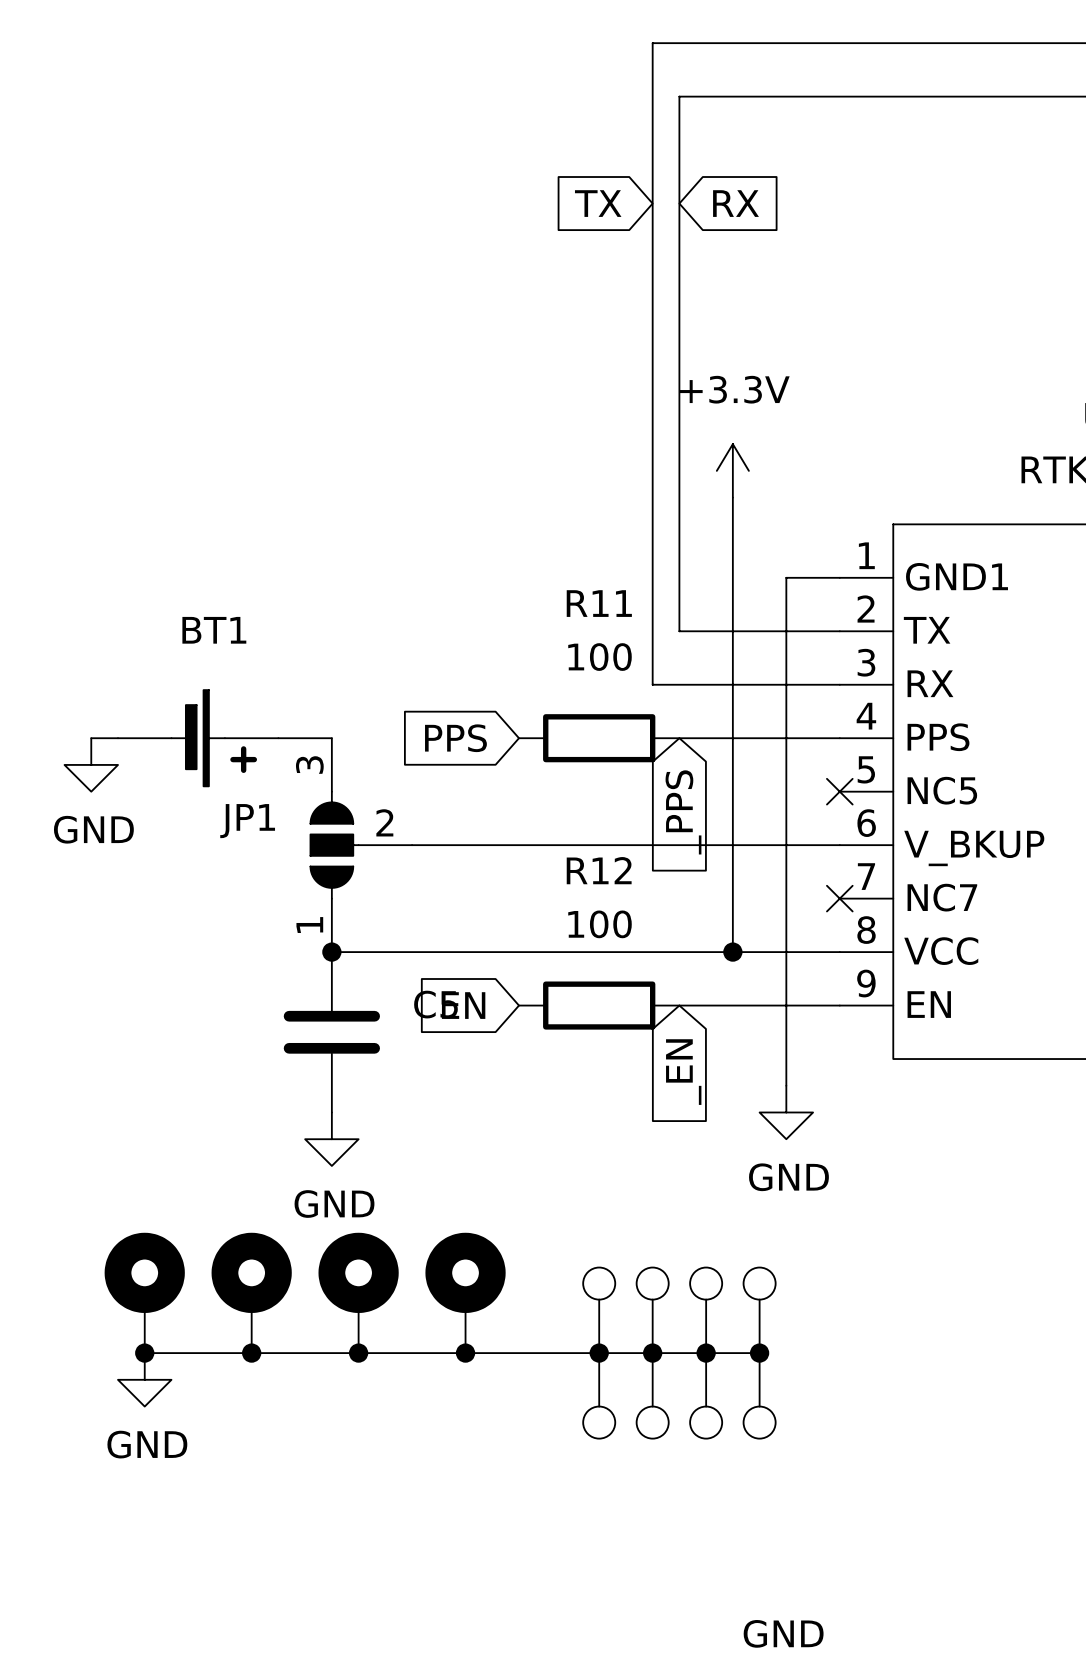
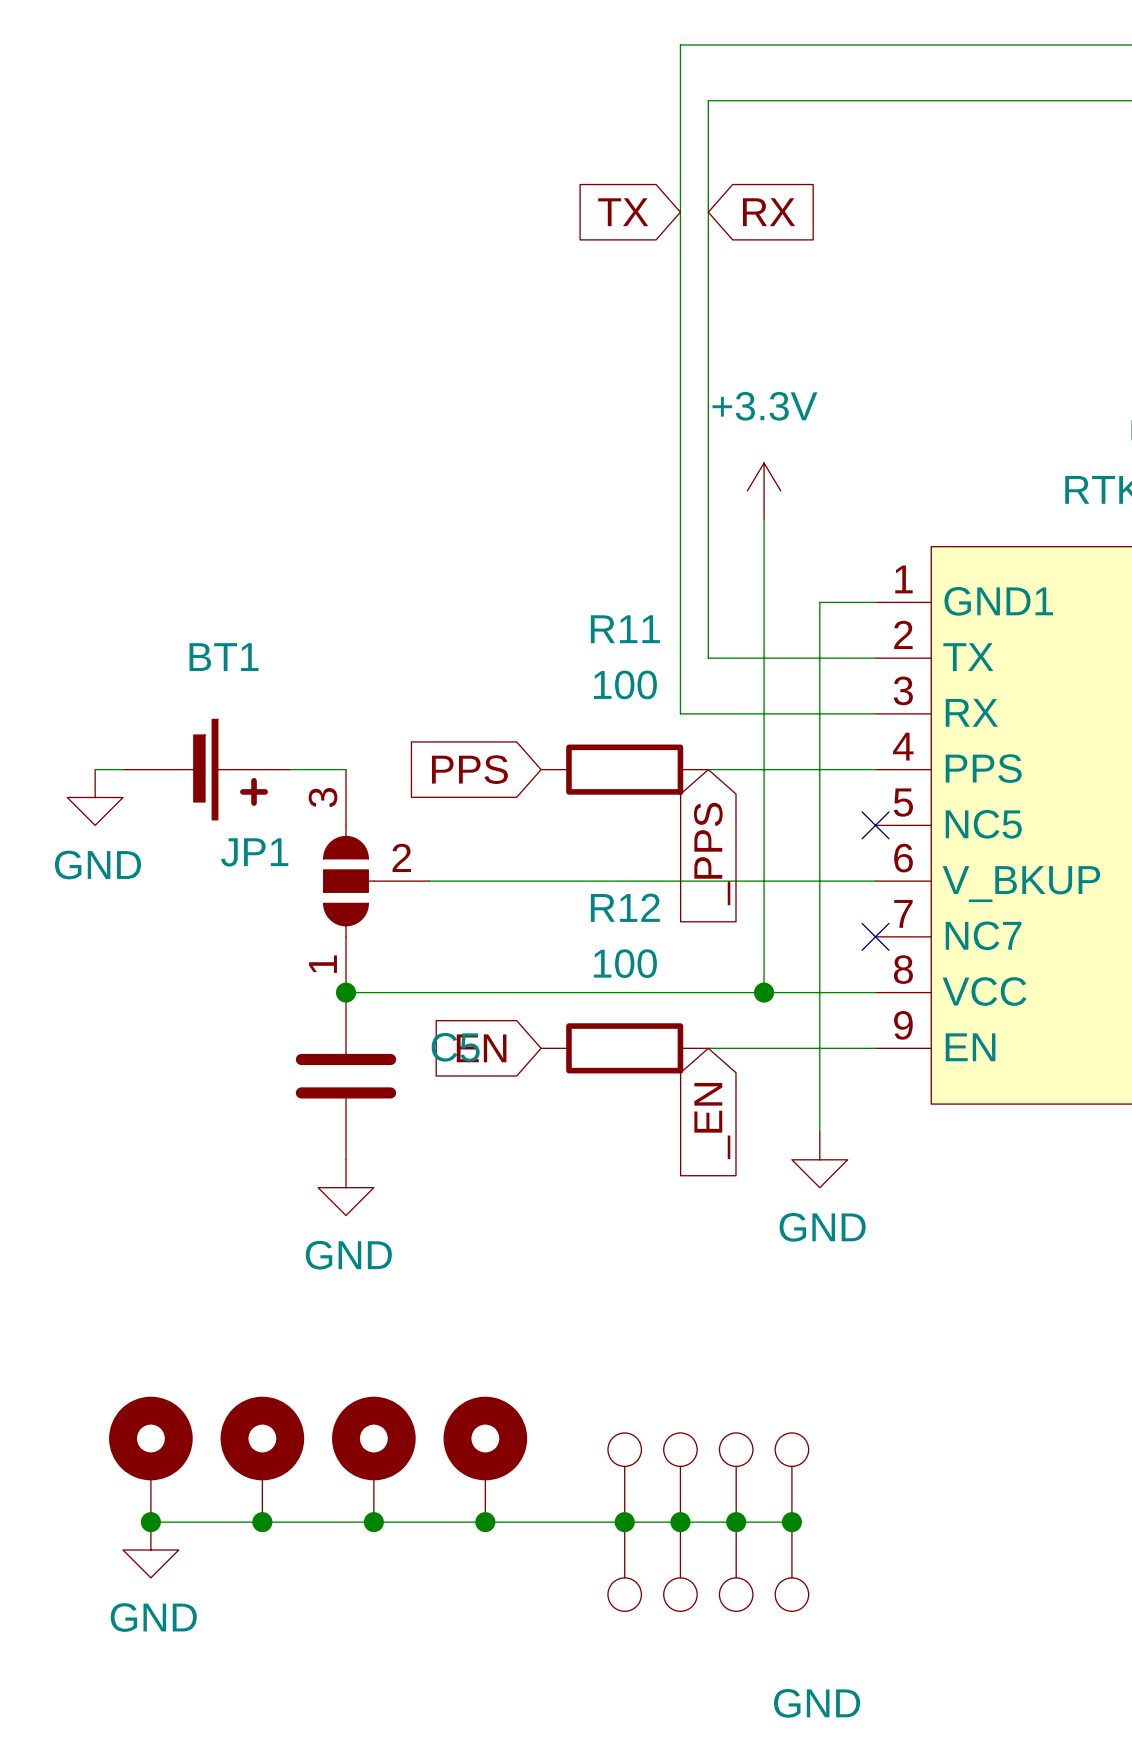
part: (144, 1292) -> none
part: (251, 1292) -> none
part: (358, 1292) -> none
part: (465, 1292) -> none
part: (599, 1310) -> none
part: (652, 1310) -> none
part: (706, 1310) -> none
part: (759, 1310) -> none
wire: (144, 1353) (759, 1353) -> (150, 1522) (791, 1522)
junction: (144, 1353) -> none
junction: (251, 1353) -> none
junction: (358, 1353) -> none
junction: (465, 1353) -> none
junction: (599, 1353) -> none
junction: (652, 1353) -> none
junction: (706, 1353) -> none
junction: (759, 1353) -> none
power symbol position: GND (144, 1379) -> GND (150, 1550)
part: none -> (150, 1459)
part: none -> (262, 1459)
part: none -> (373, 1459)
part: none -> (485, 1459)
part rotation: 0° (599, 1422) -> 180° (624, 1449)
part rotation: 0° (652, 1422) -> 180° (680, 1449)
part rotation: 0° (706, 1422) -> 180° (736, 1449)
part rotation: 0° (759, 1422) -> 180° (791, 1449)
junction: none -> (150, 1522)
junction: none -> (262, 1522)
junction: none -> (373, 1522)
junction: none -> (485, 1522)
junction: none -> (624, 1522)
junction: none -> (680, 1522)
junction: none -> (736, 1522)
junction: none -> (791, 1522)
part: none -> (624, 1566)
part: none -> (680, 1566)
part: none -> (736, 1566)
part: none -> (791, 1566)

